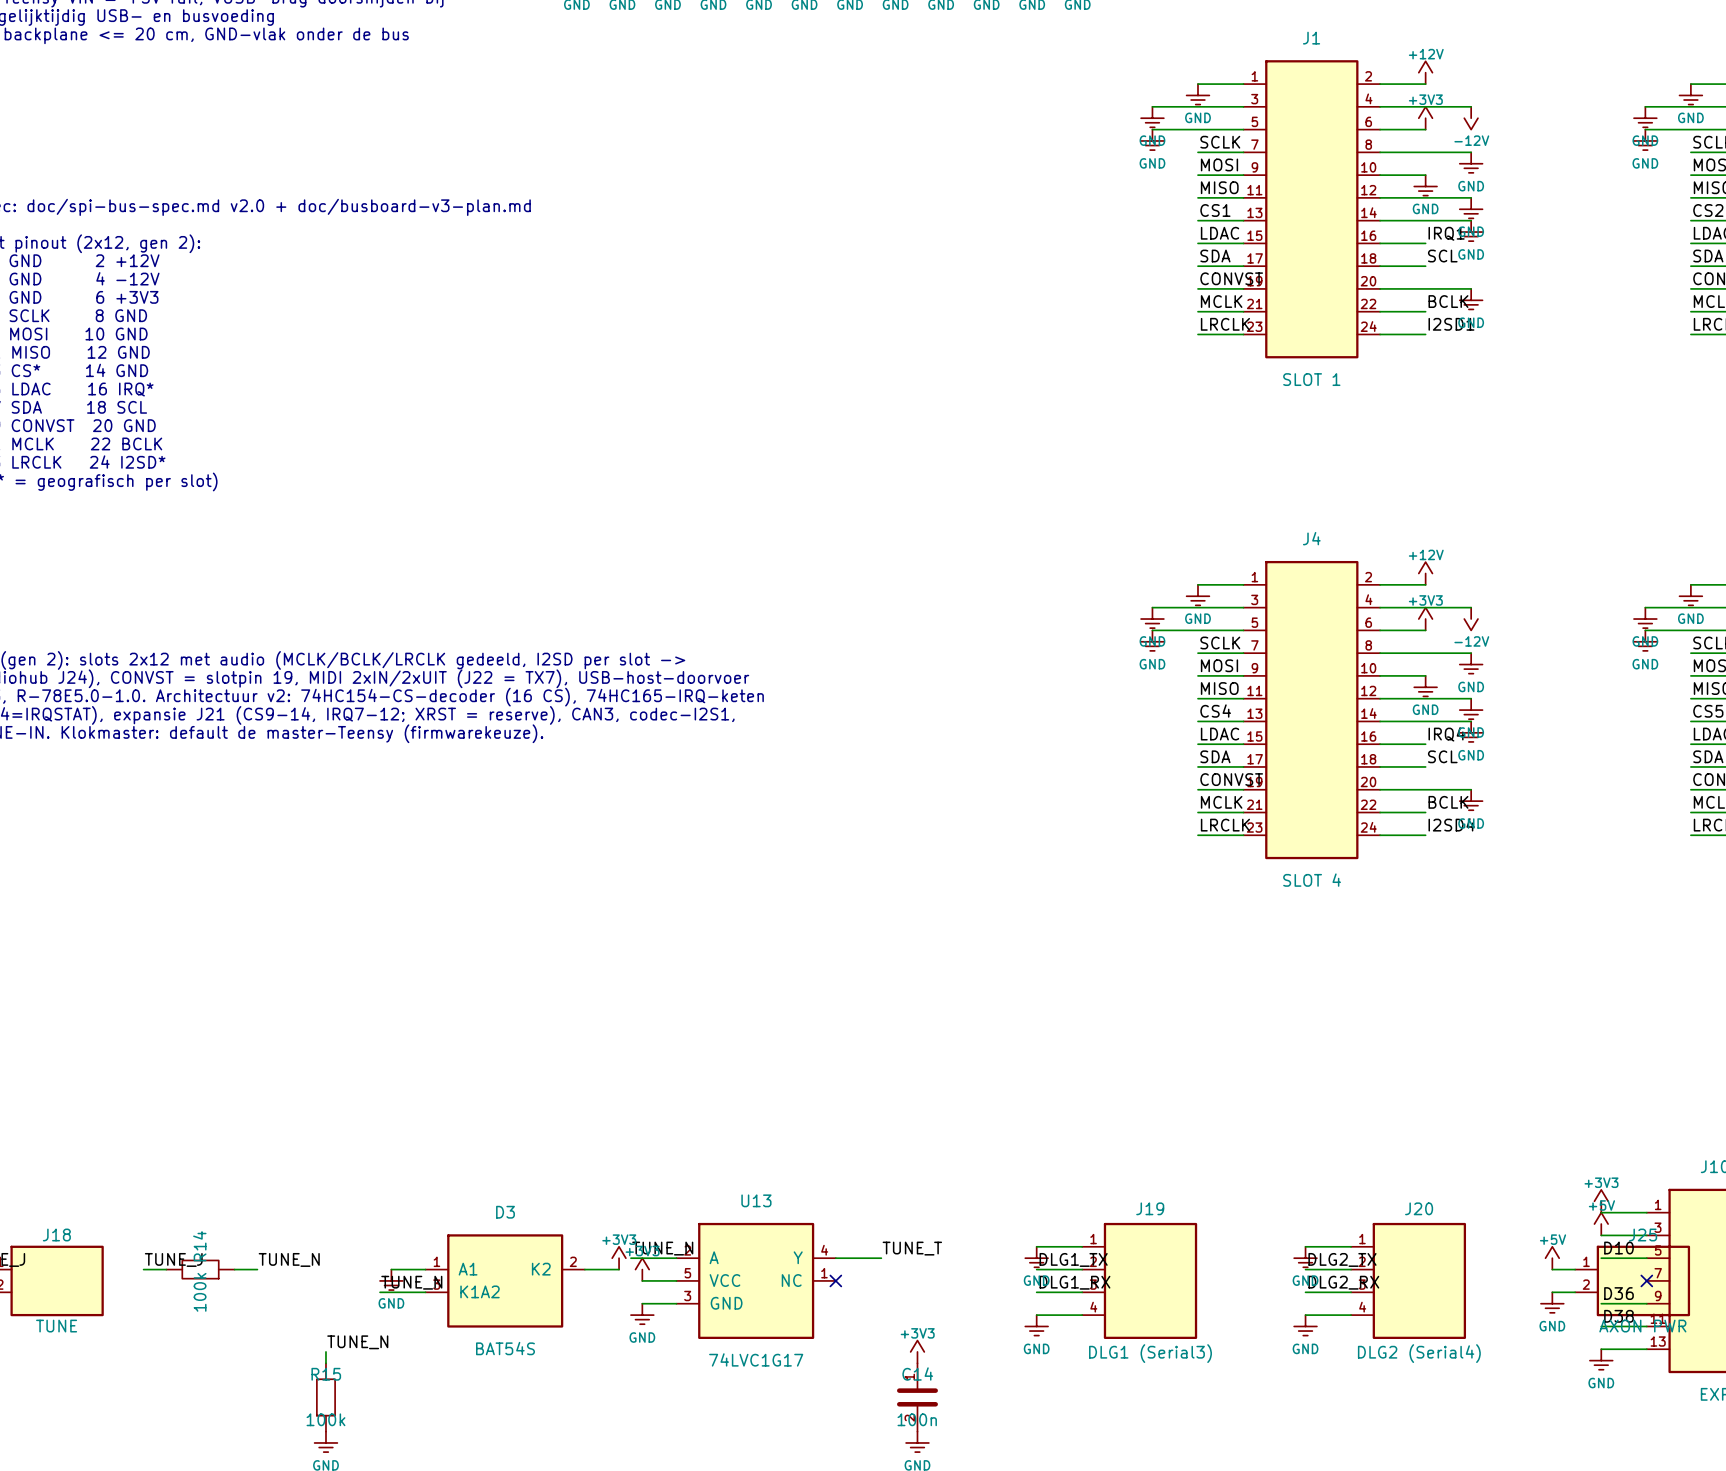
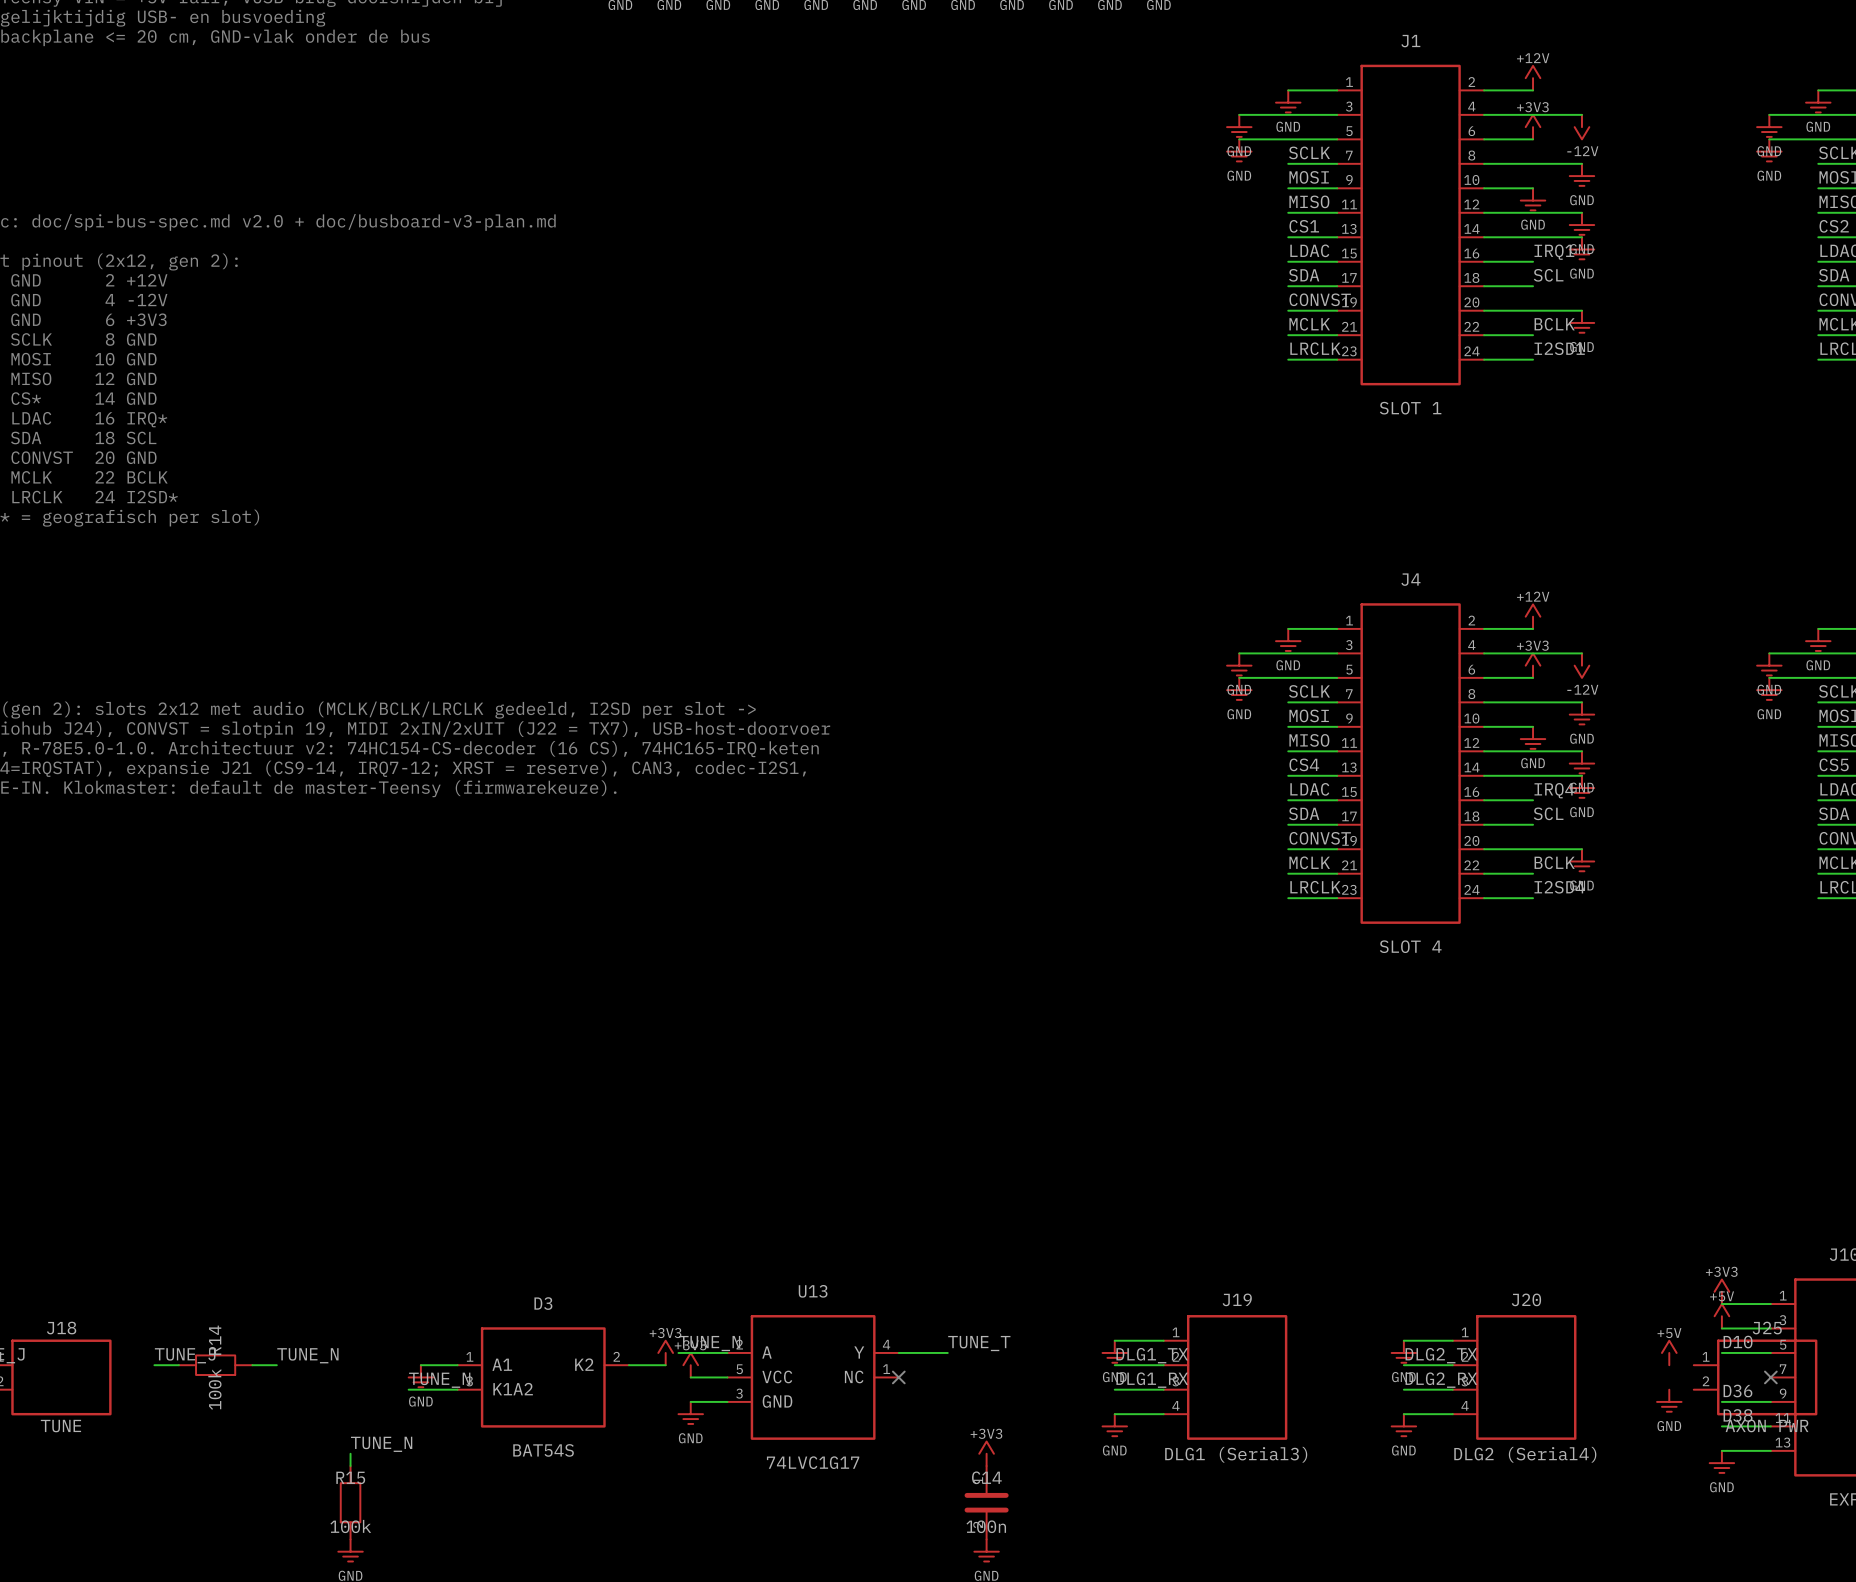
wire: (1552, 1269) (1575, 1269) -> none
wire: (1552, 1292) (1575, 1292) -> none

